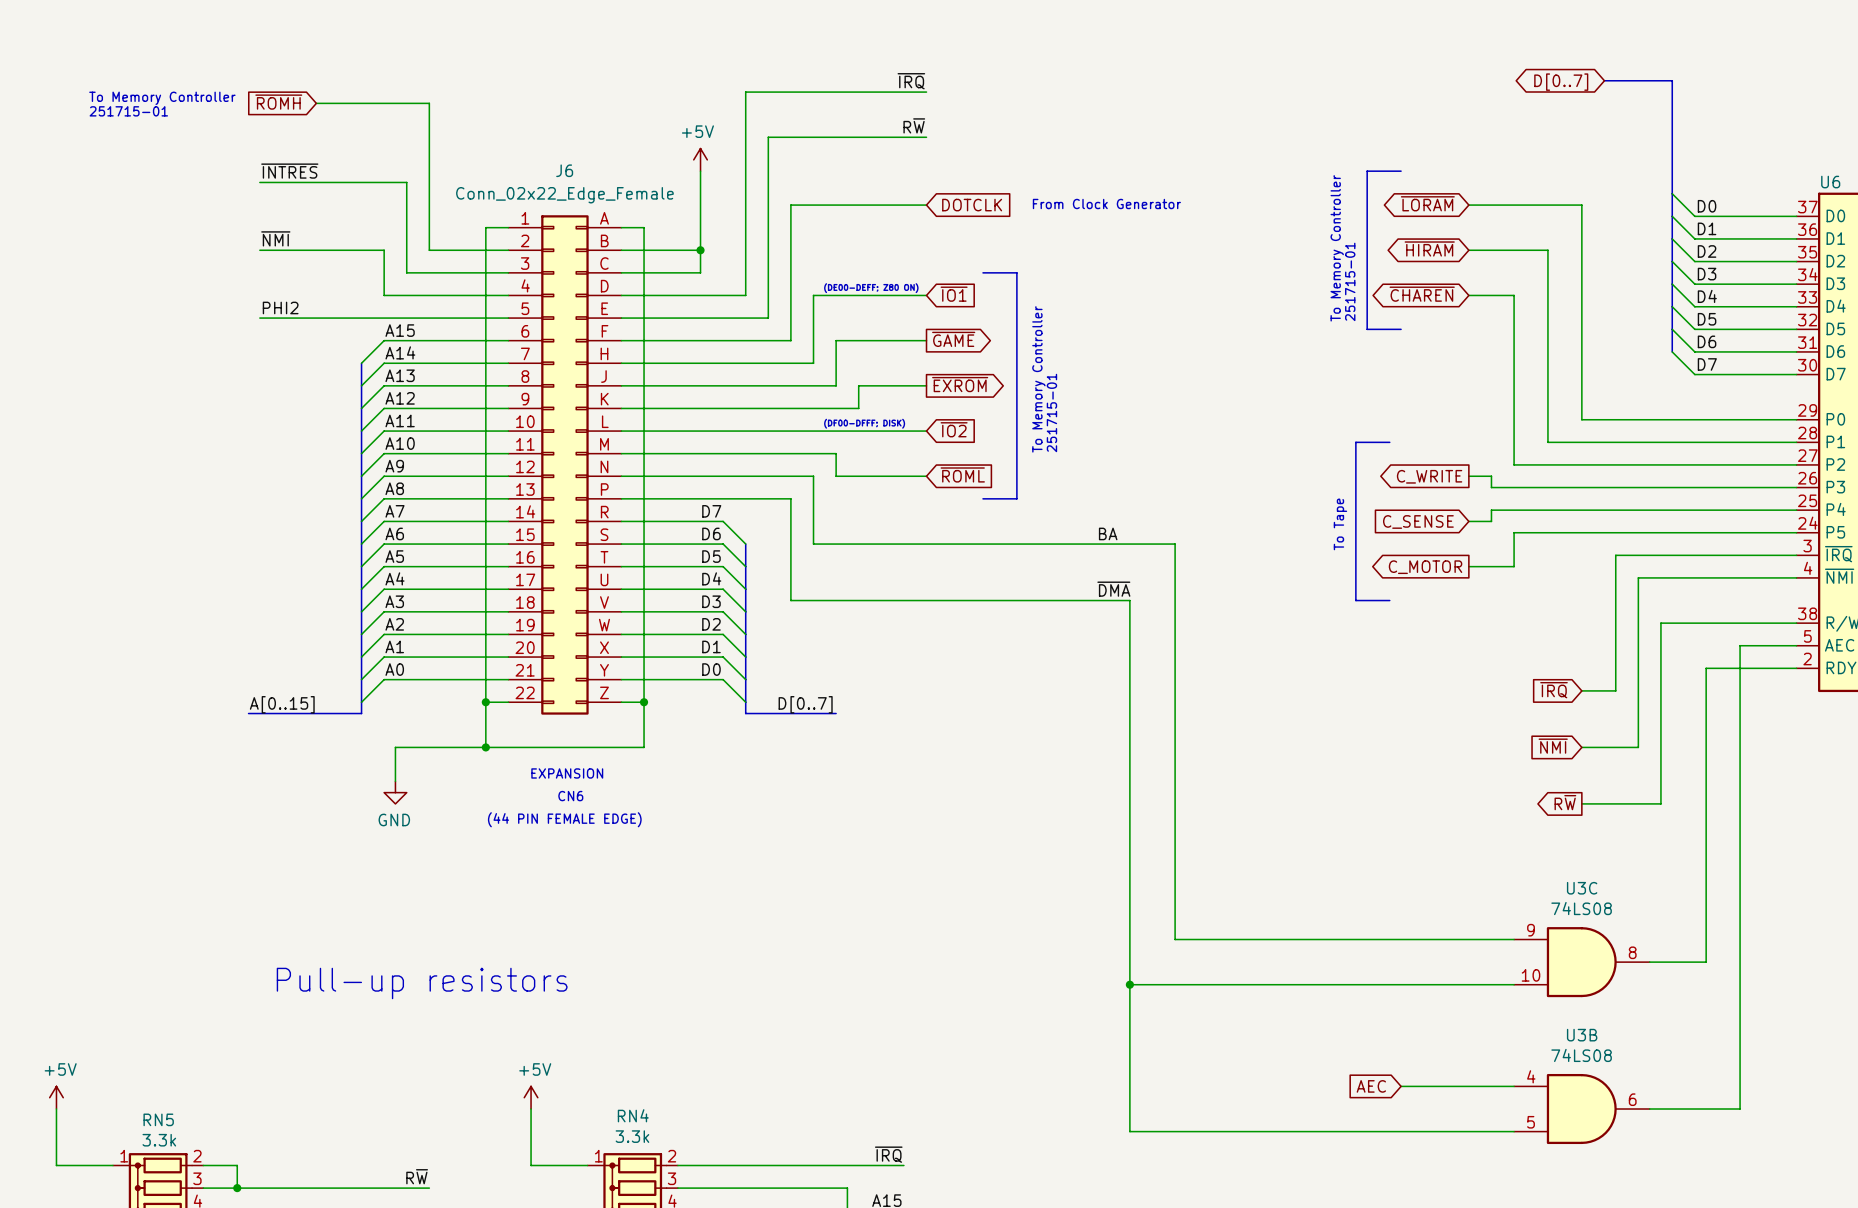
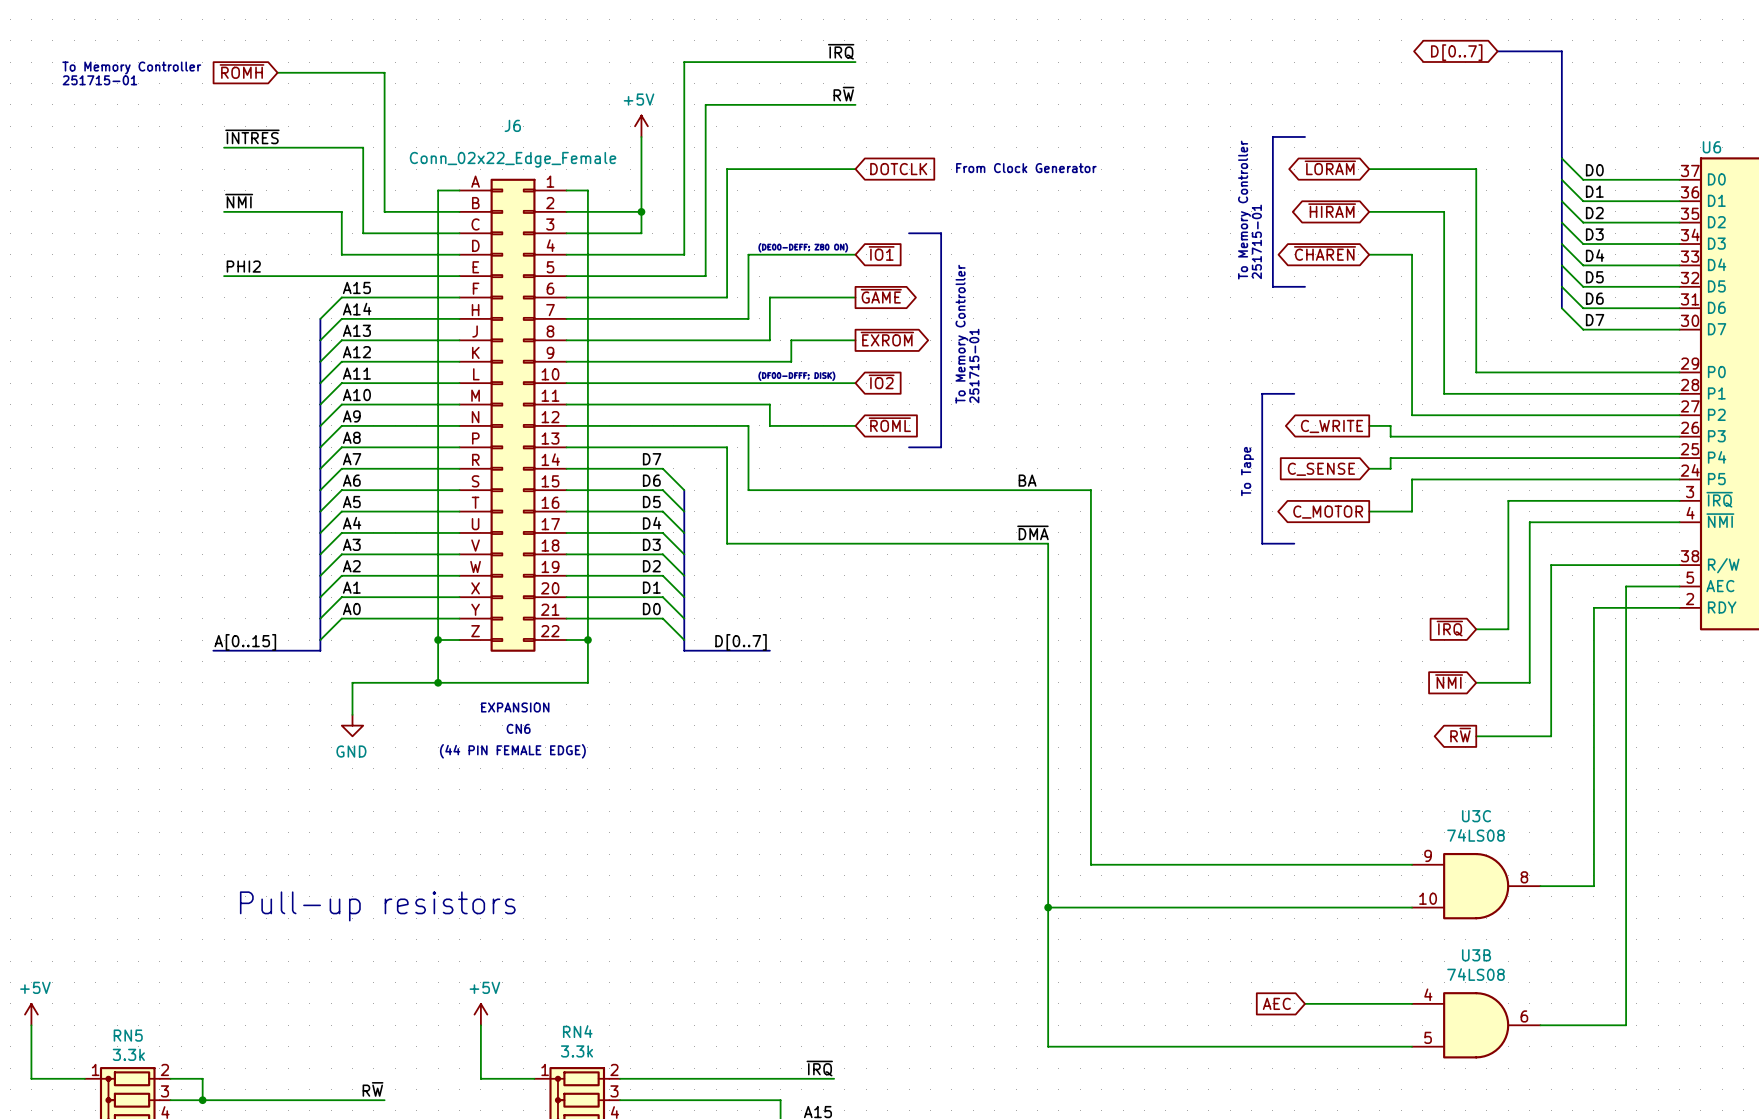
J6 flip: as is (564, 464) -> left-right (513, 415)

